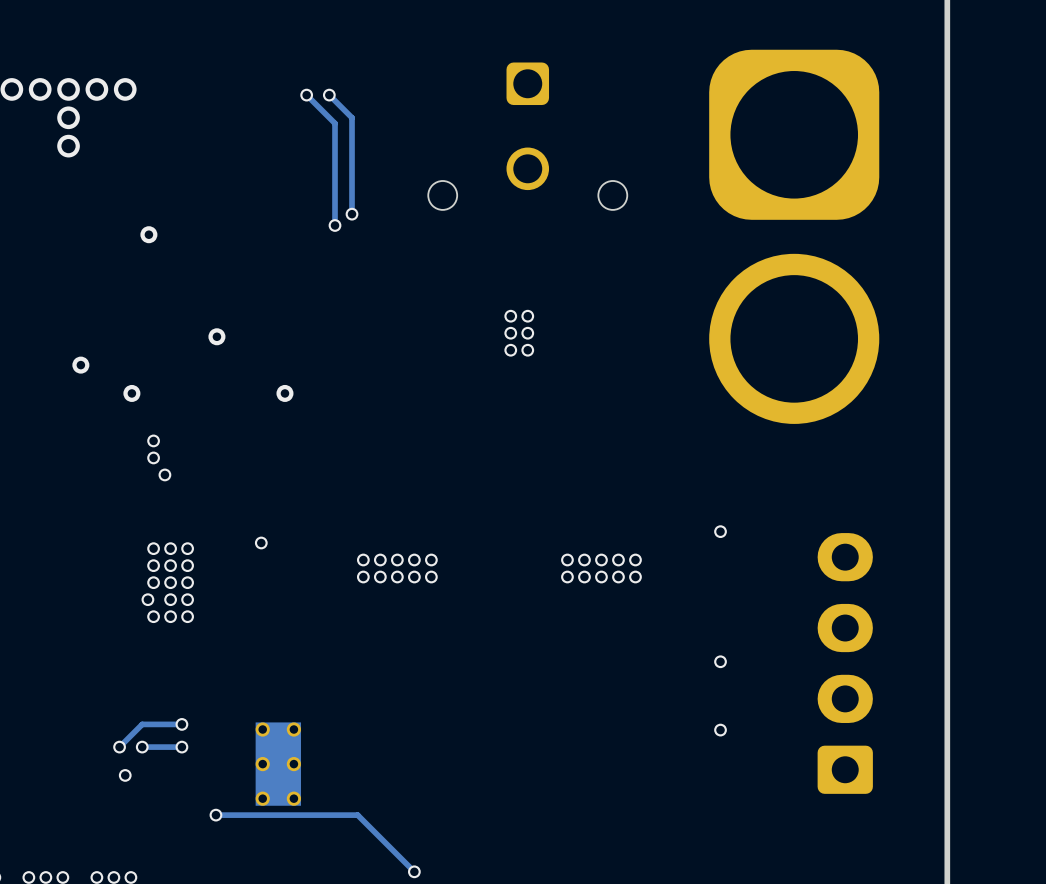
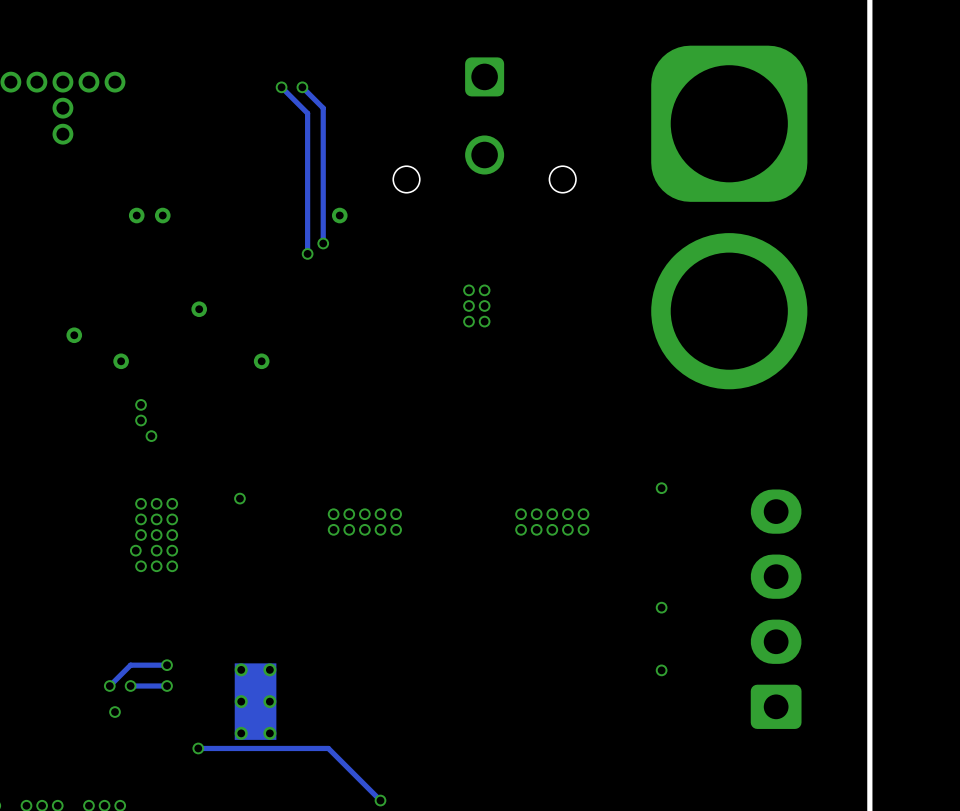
track: none -> (323, 196) (323, 243)
via: (352, 214) -> none
track: none -> (307, 207) (307, 253)
via: (335, 225) -> none
via: none -> (162, 215)
via: none -> (339, 215)
via: none -> (323, 243)
via: none -> (307, 253)

